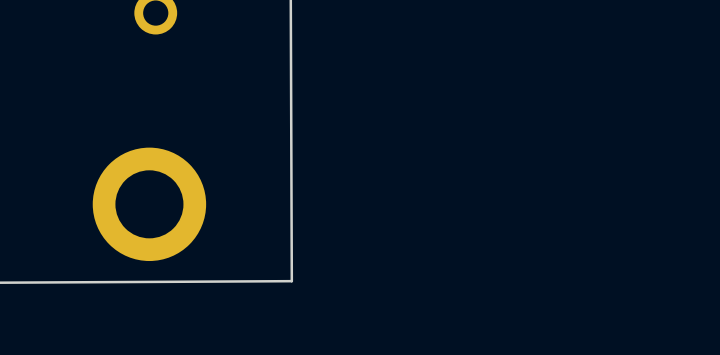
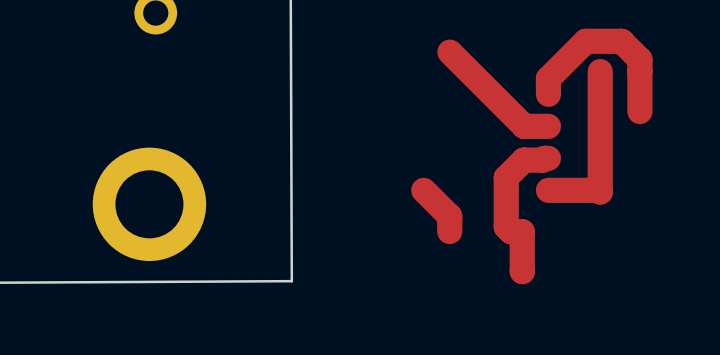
top track: none -> (449, 52) (524, 126) (548, 126)
top track: none -> (600, 71) (600, 191) (598, 190) (548, 190)
top track: none -> (548, 94) (548, 78) (585, 41) (621, 41) (639, 59) (639, 111)
top track: none -> (548, 158) (523, 160) (506, 177) (506, 226) (511, 231) (522, 231) (522, 271)
top track: none -> (423, 190) (449, 216) (449, 231)

